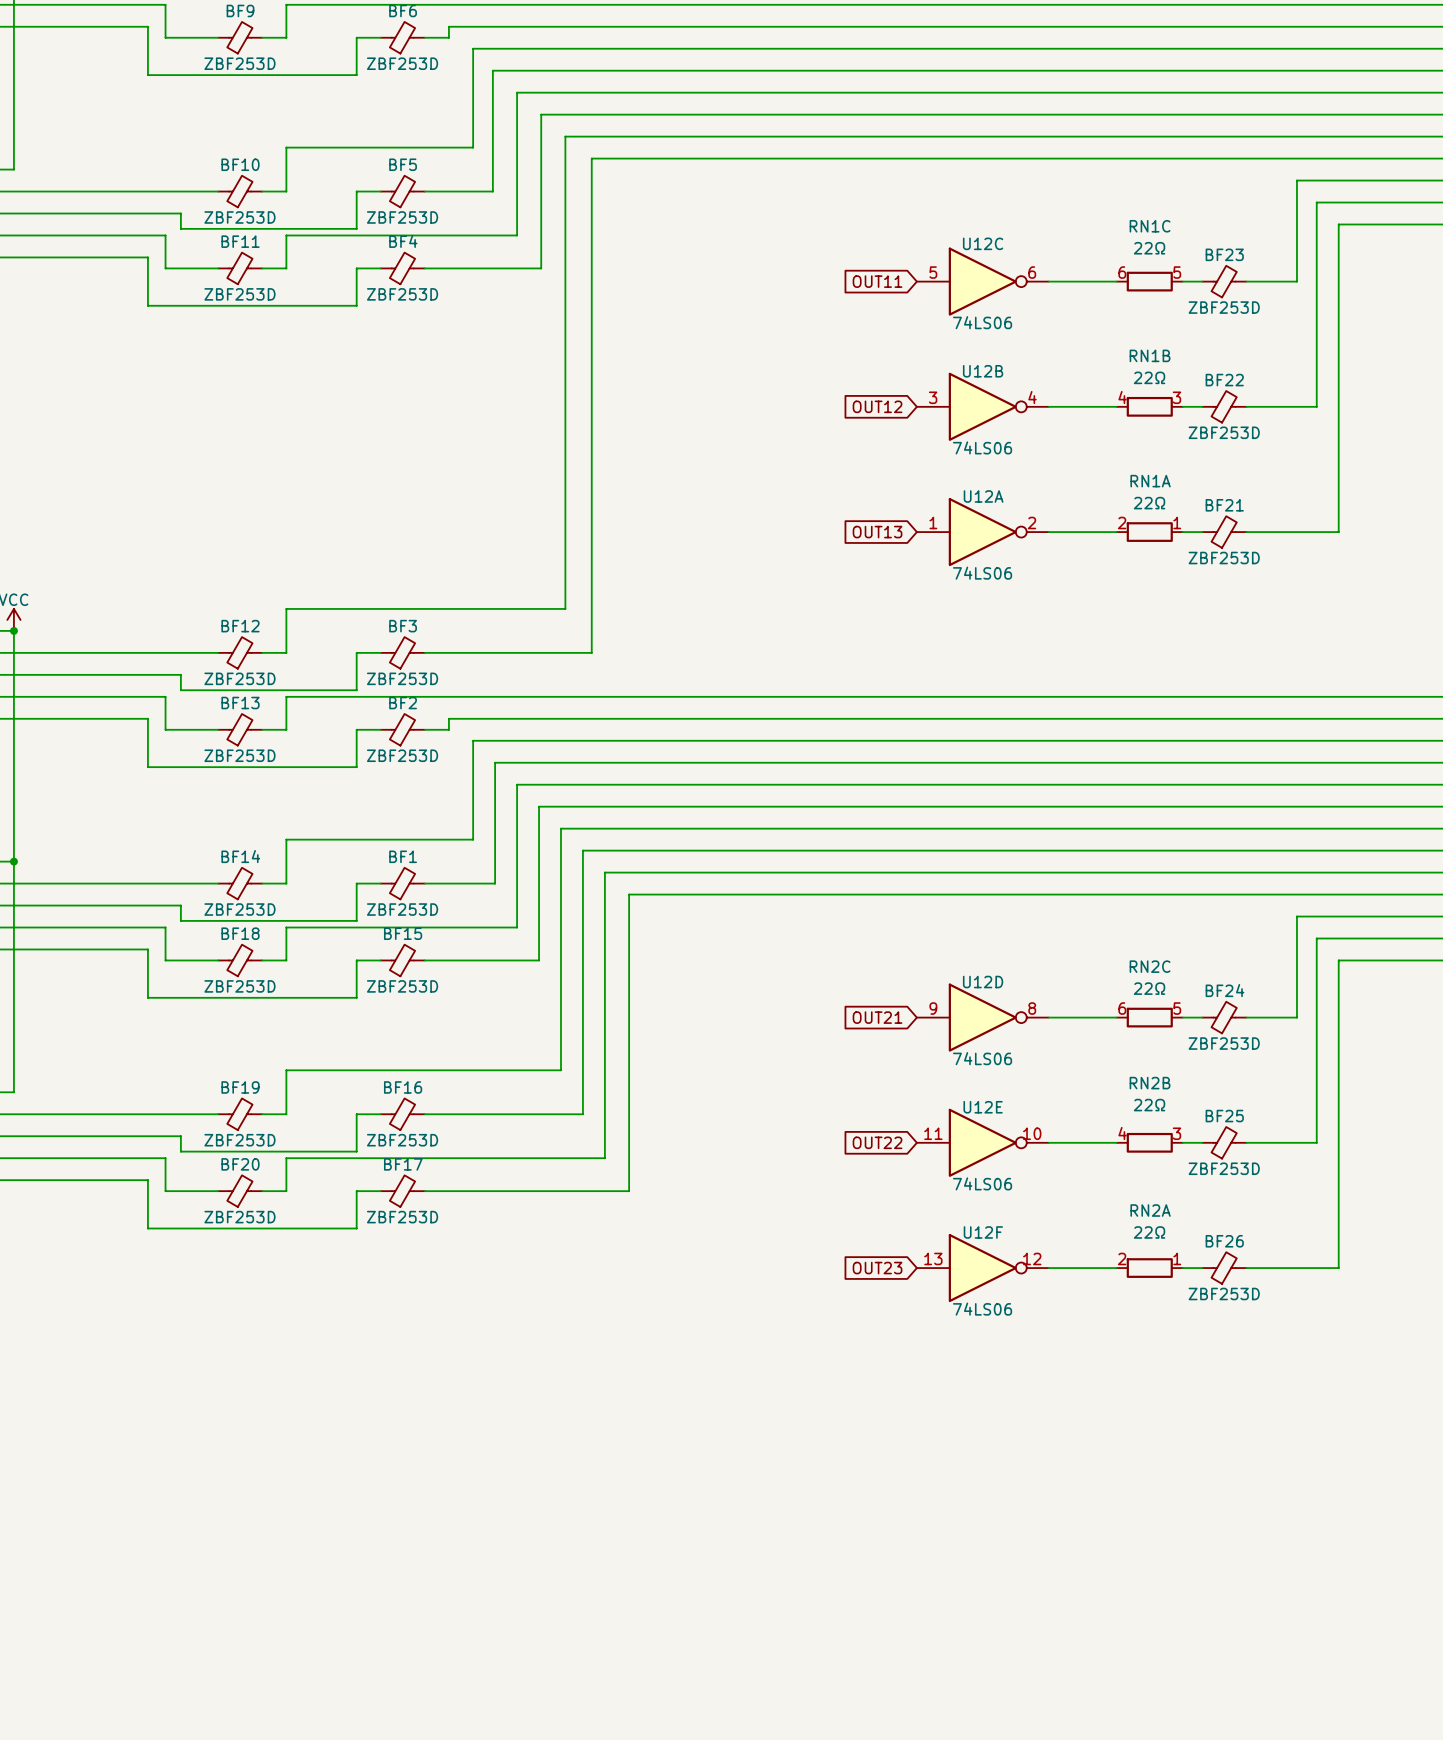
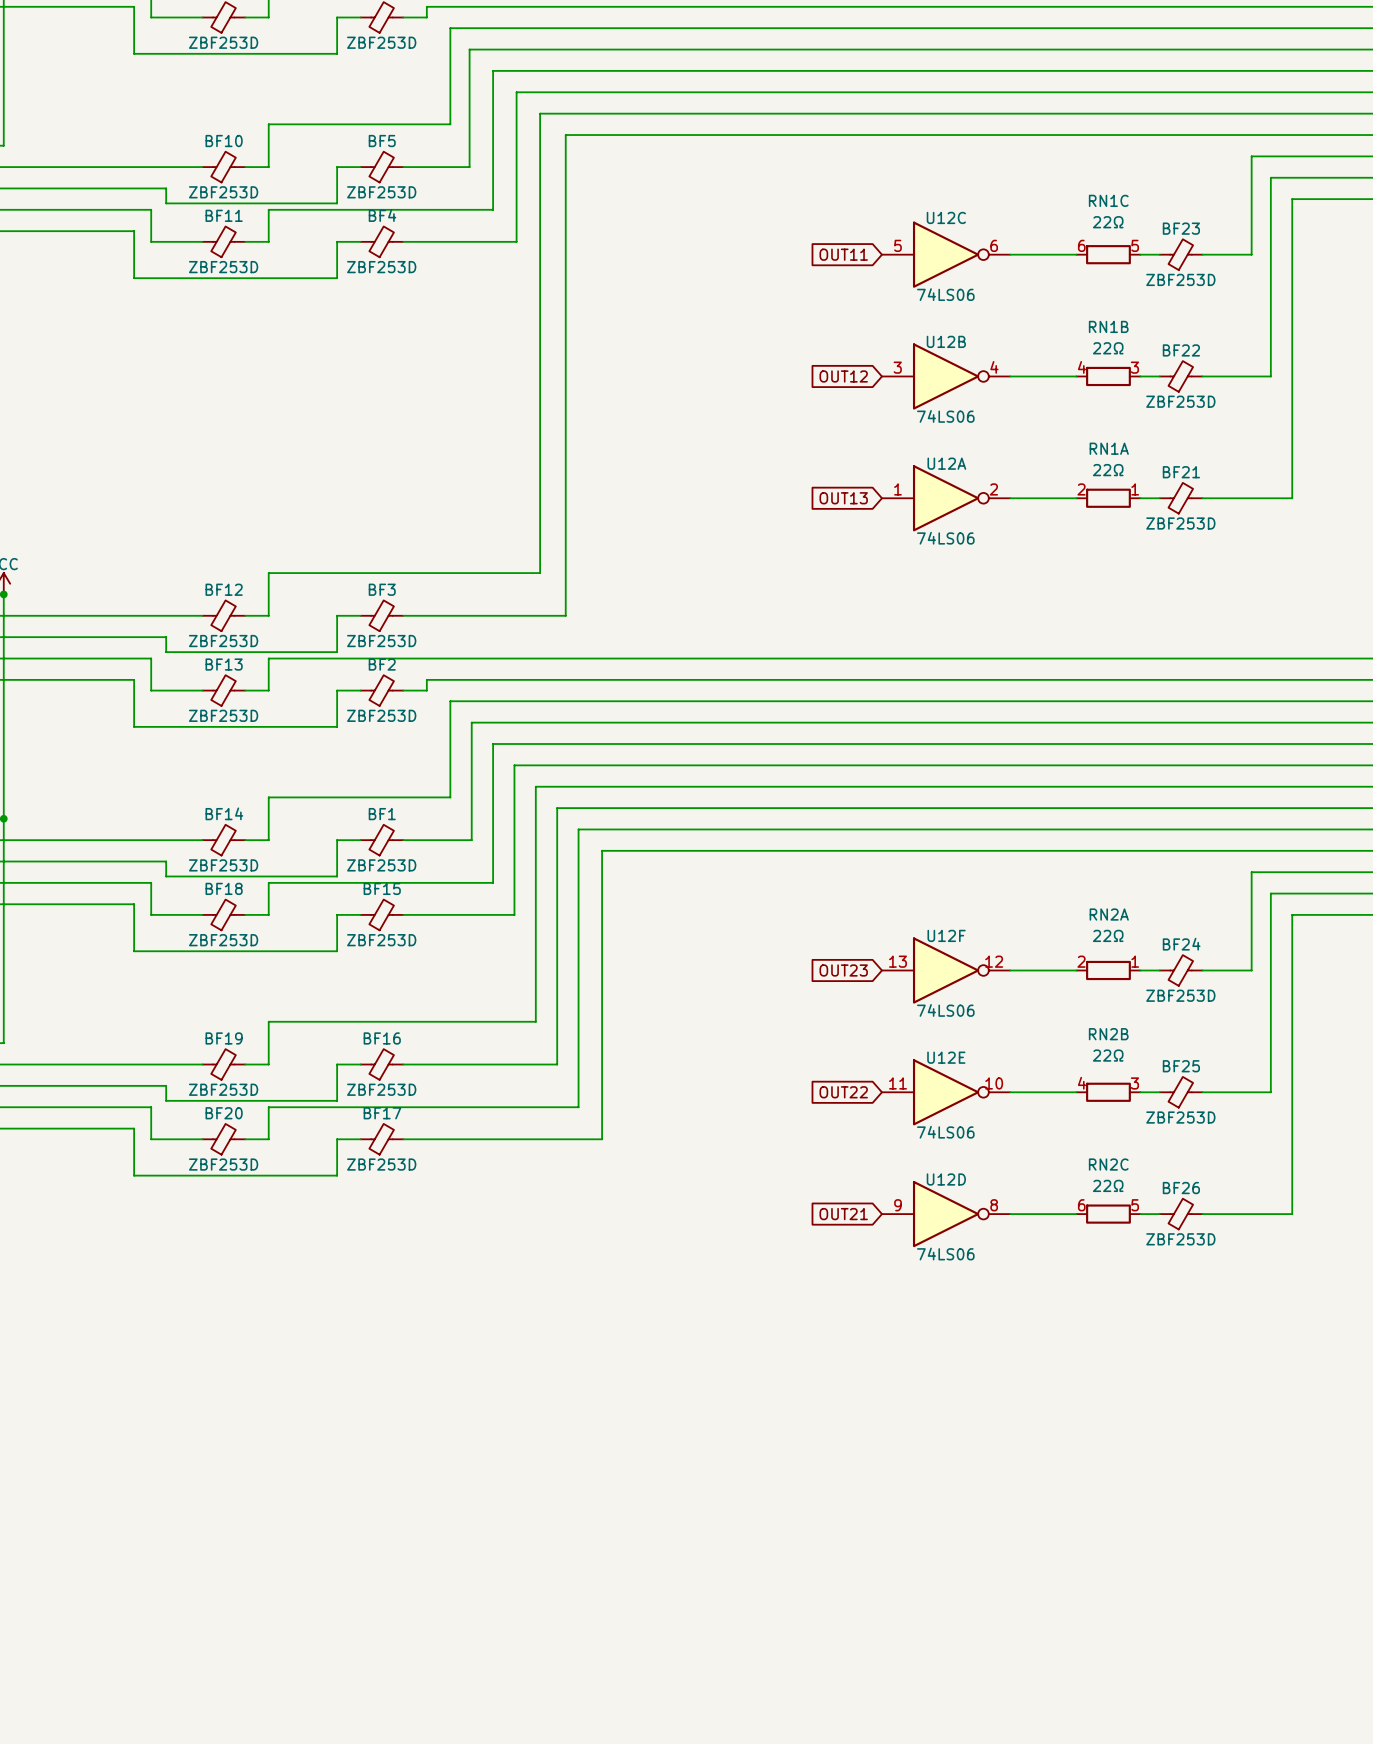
global label: OUT21 (877, 1017) -> OUT23 (843, 970)
U12D position: (982, 1017) -> (946, 1214)
RN2C position: (1149, 1017) -> (1108, 1214)
global label: OUT23 (877, 1268) -> OUT21 (843, 1214)
U12F position: (982, 1268) -> (946, 970)
RN2A position: (1149, 1268) -> (1108, 970)

